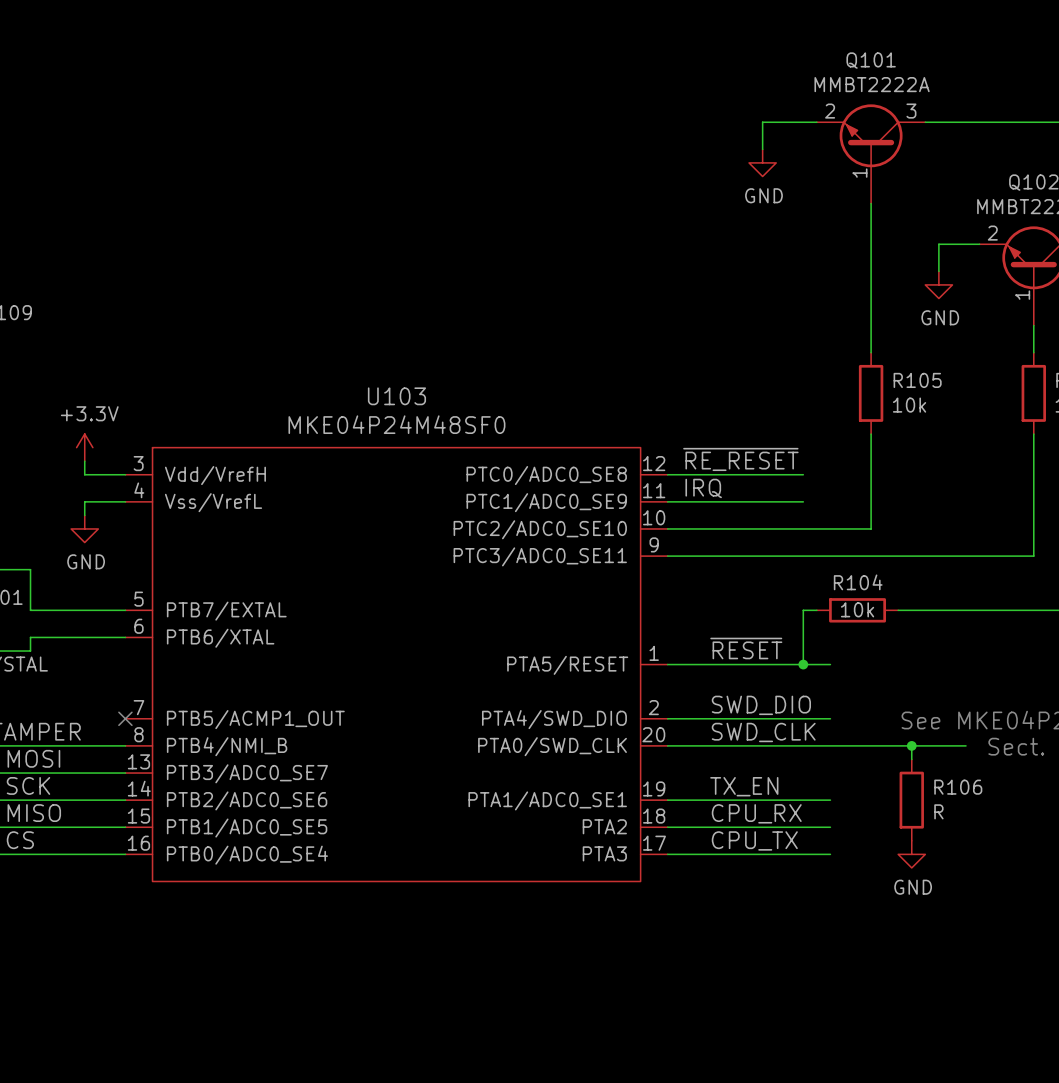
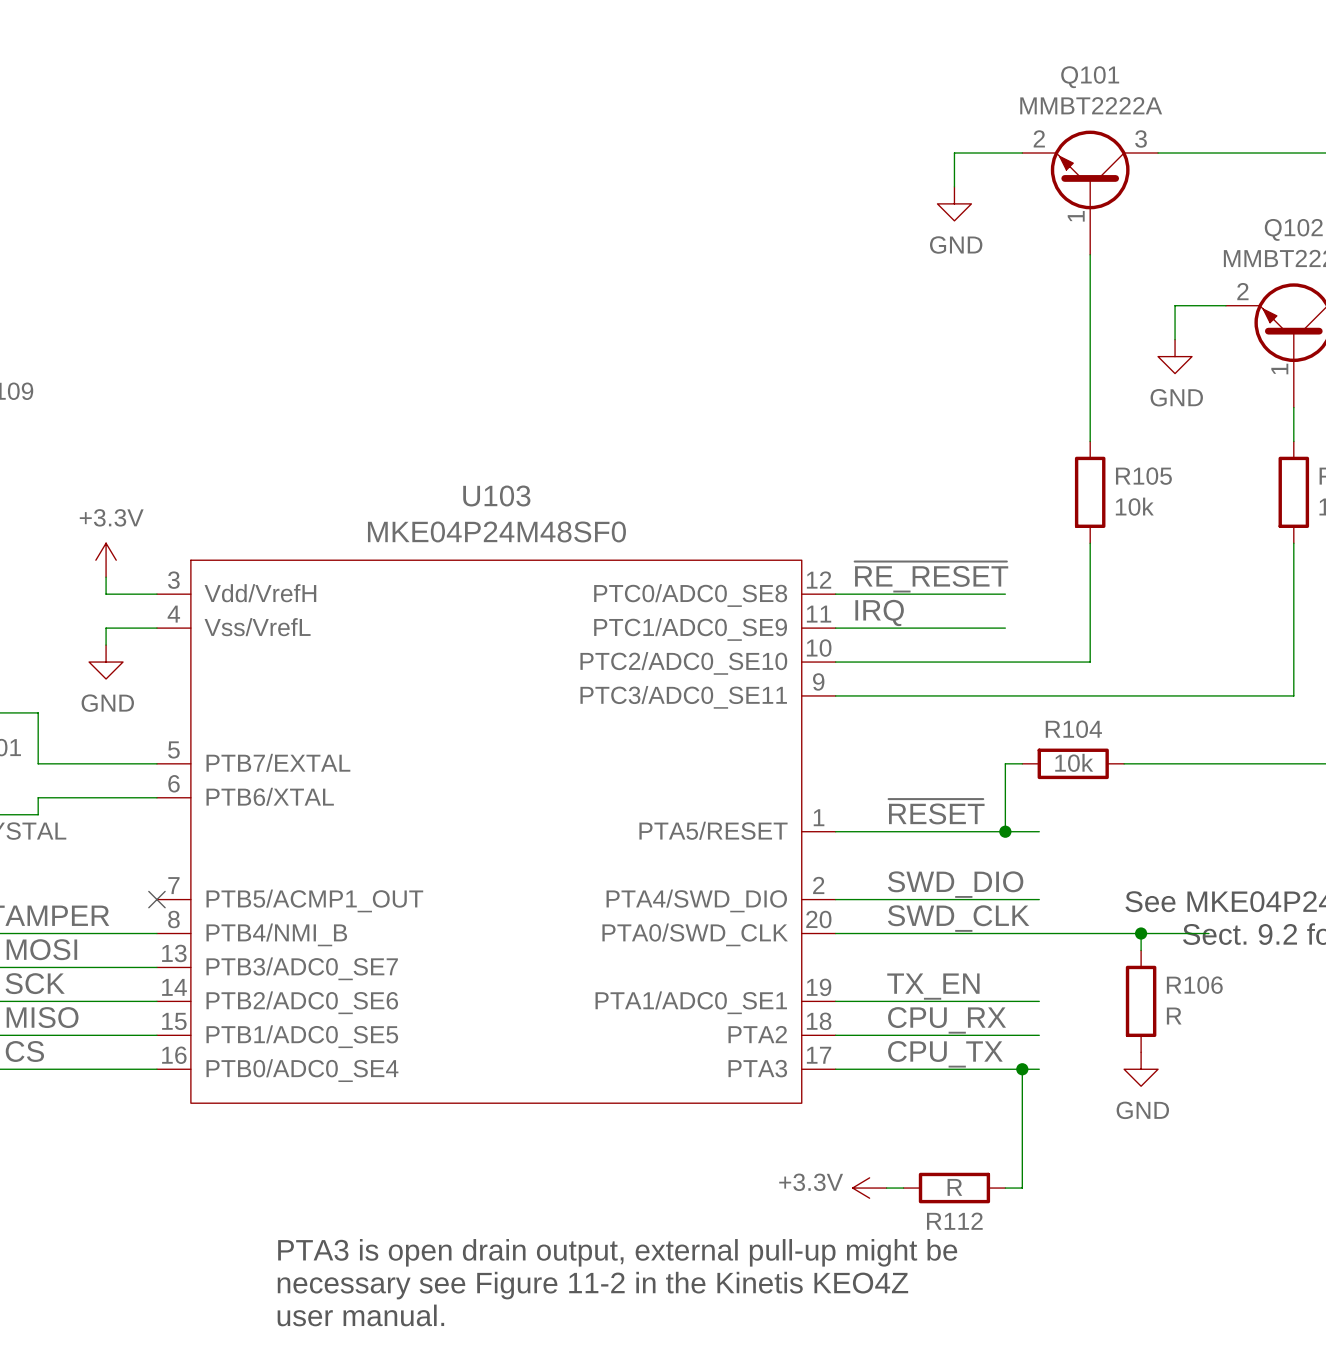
wire: none -> (1022, 1069) (1022, 1188) (1005, 1188)
junction: none -> (1022, 1069)
power symbol: none -> +3.3V (869, 1188)
wire: none -> (886, 1188) (903, 1188)
R112: none -> R (954, 1188)
text: none -> PTA3 is open drain output, external pull-up might be (617, 1252)
text: none -> necessary see Figure 11-2 in the Kinetis KEO4Z (592, 1285)
text: none -> user manual. (360, 1315)

